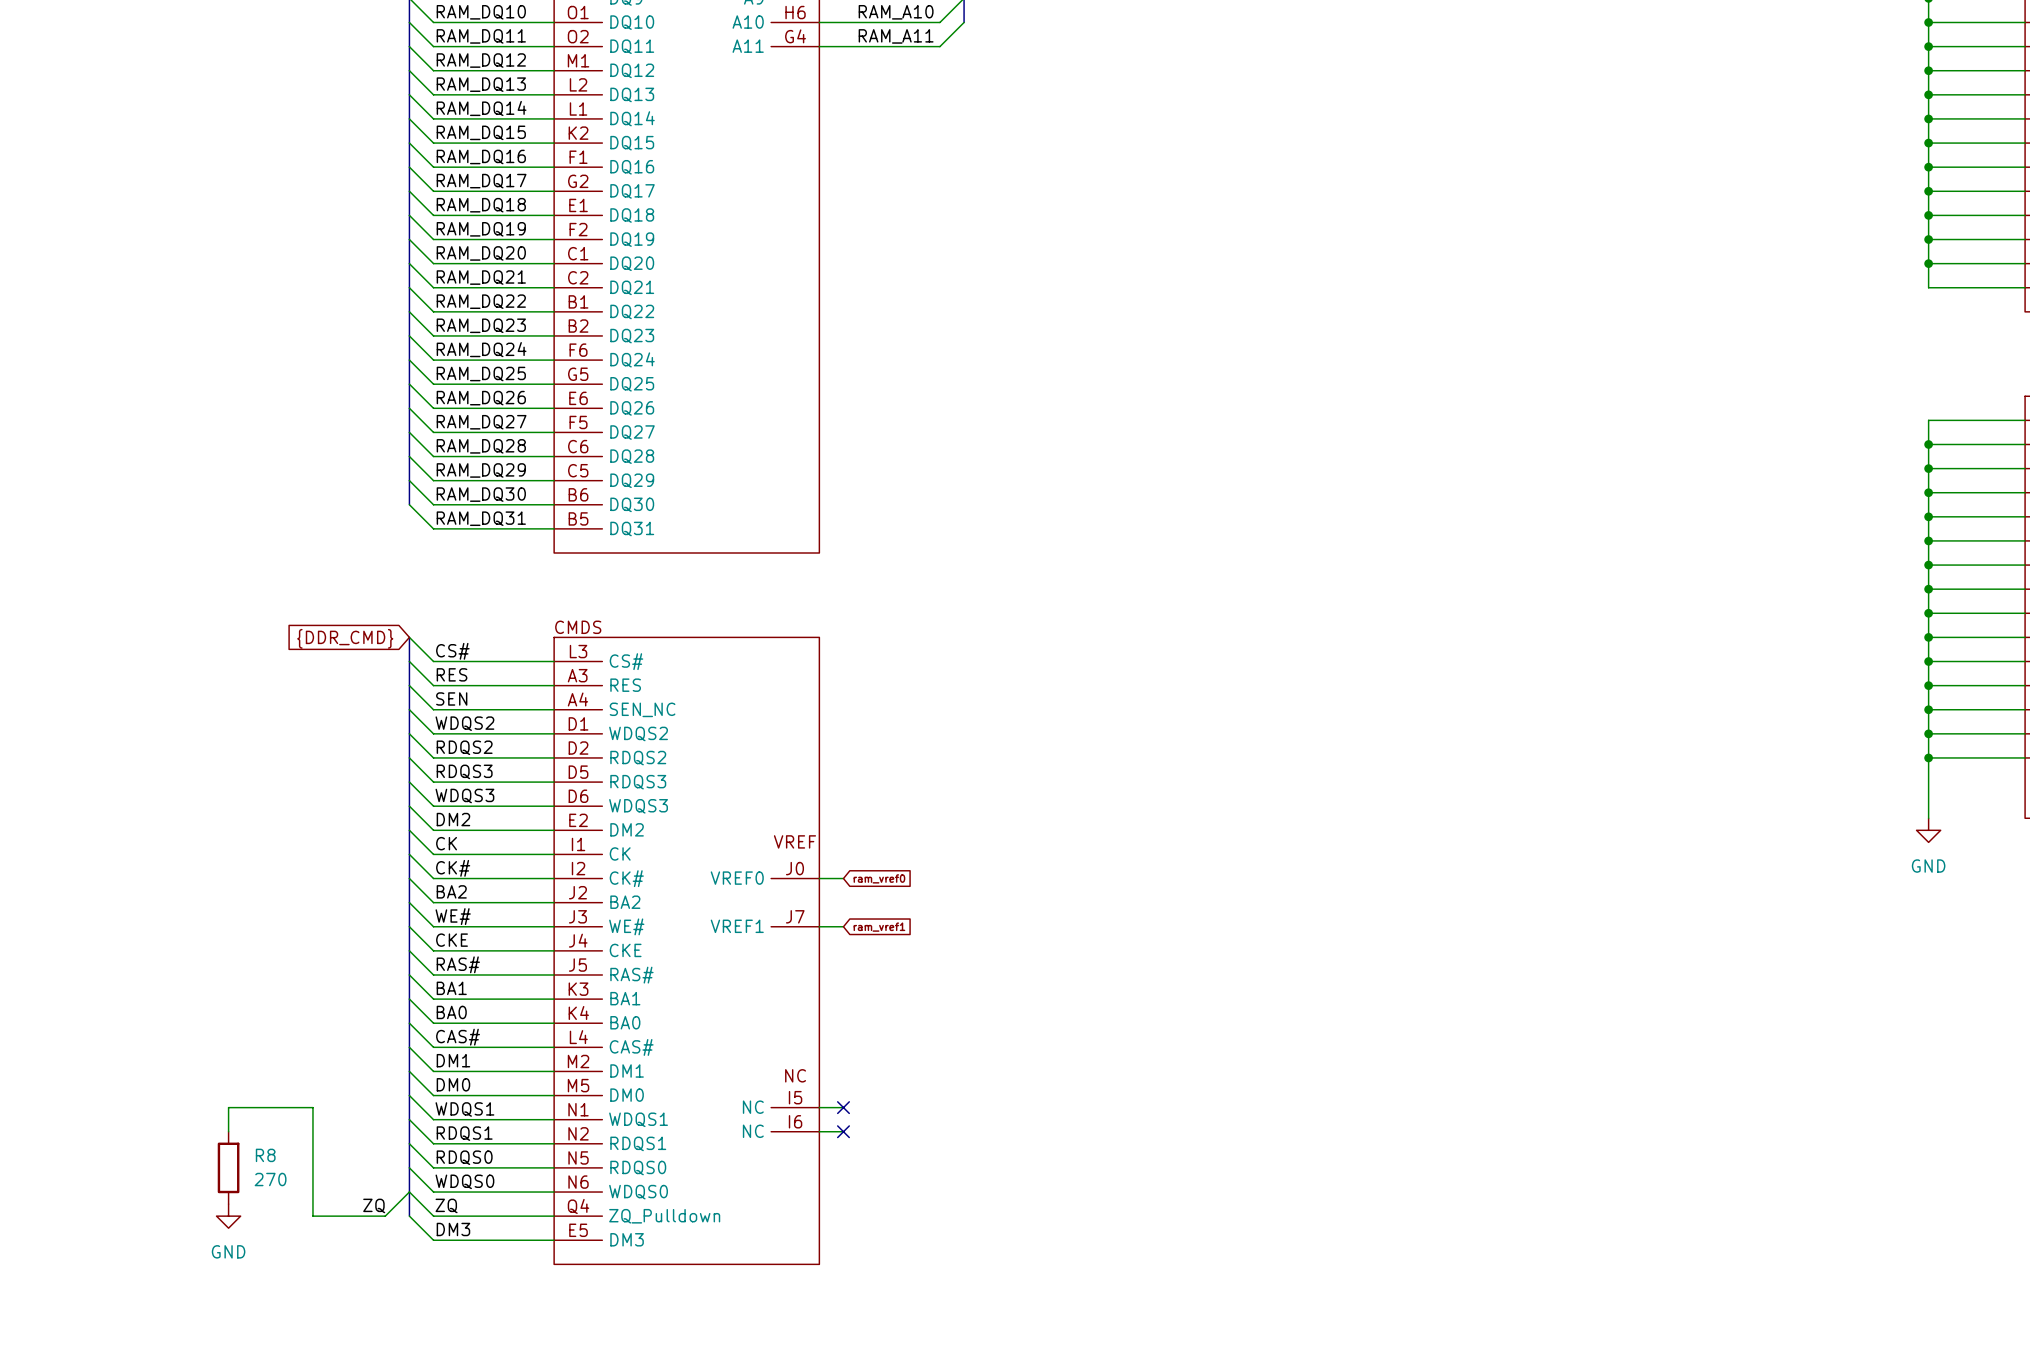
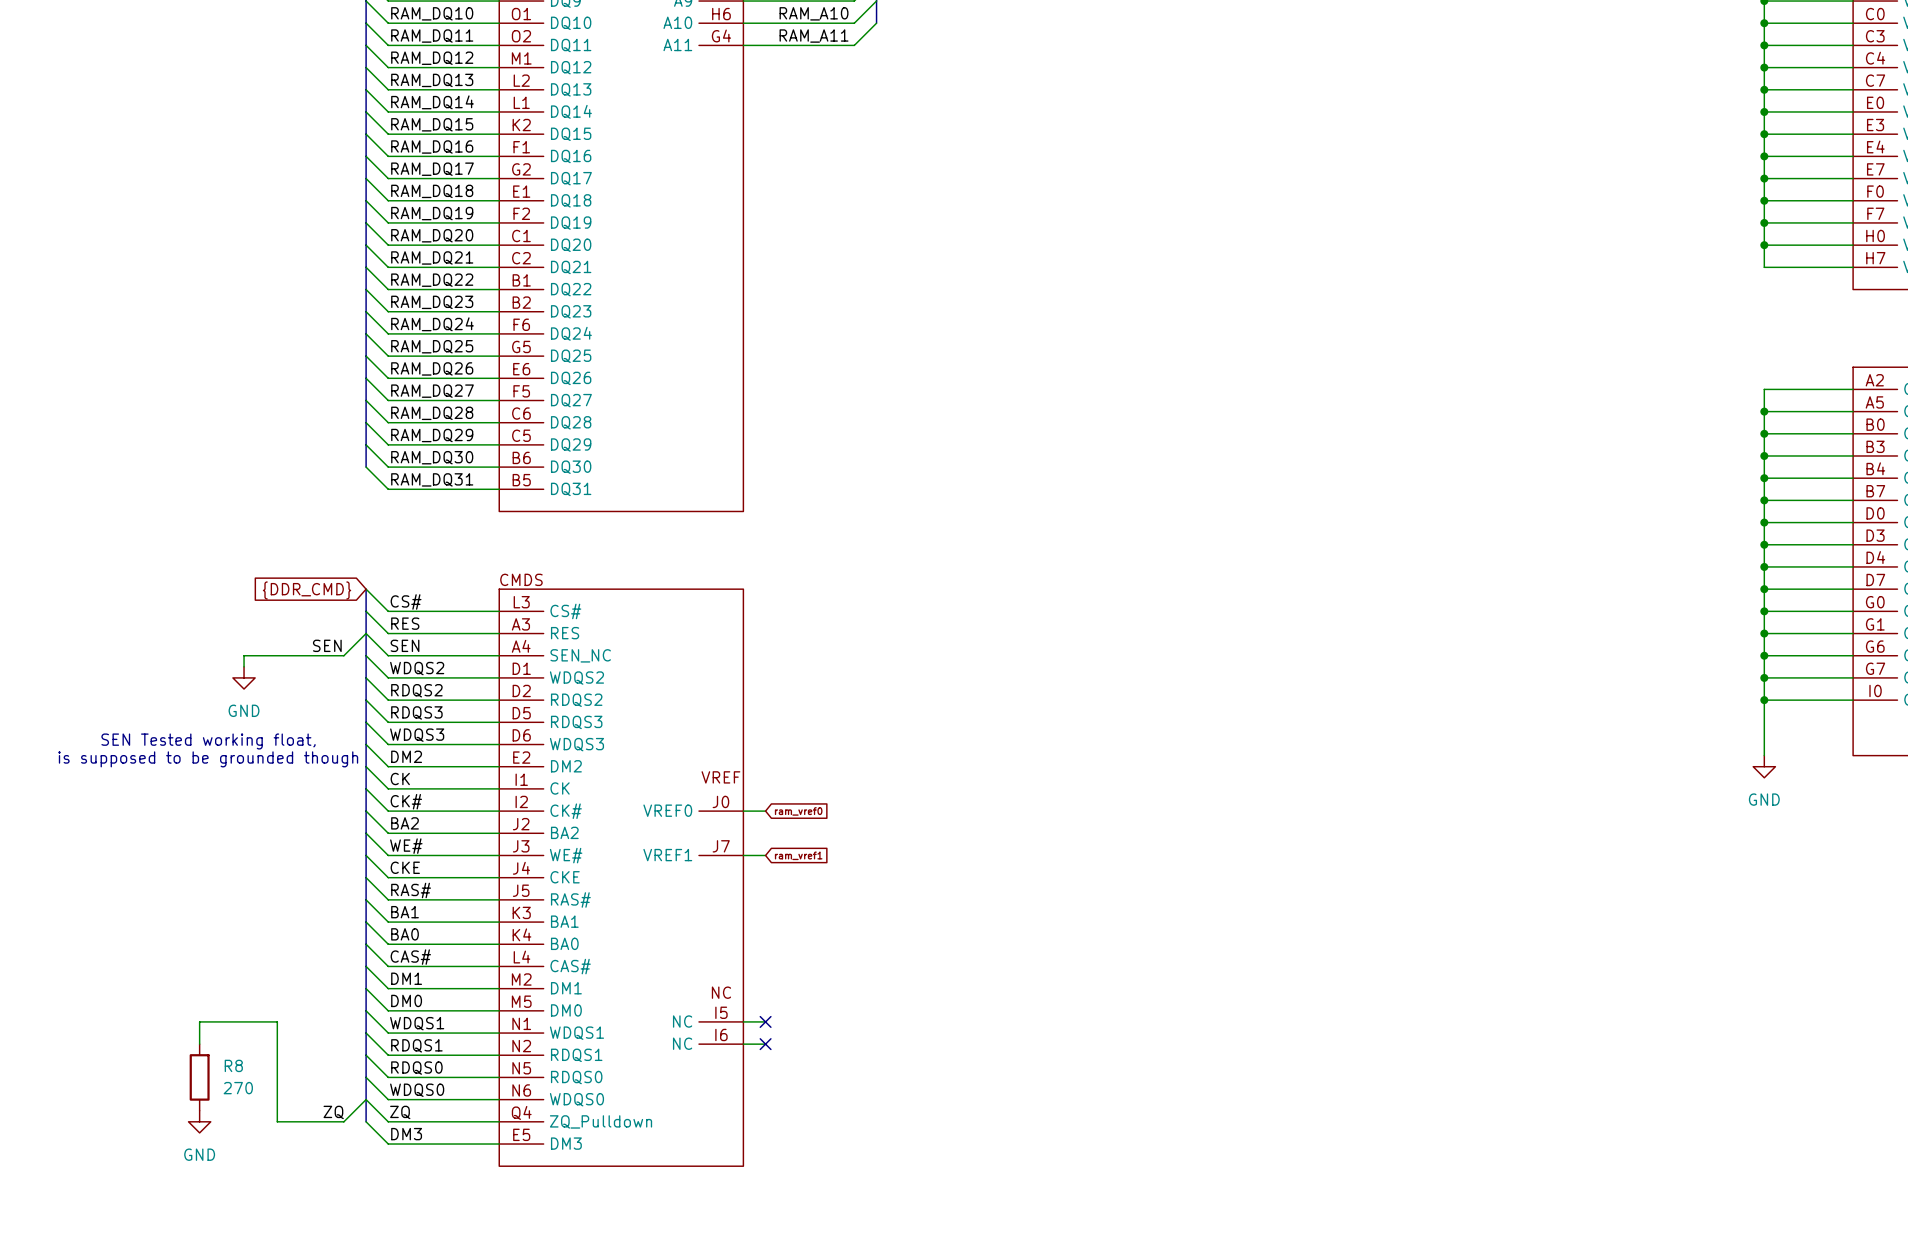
wire: none -> (366, 633) (343, 655) (244, 655) (244, 666)
label: none -> SEN (327, 645)
power symbol: none -> GND (244, 677)
text: none -> SEN Tested working float, (208, 741)
text: none -> is supposed to be grounded though (208, 759)

